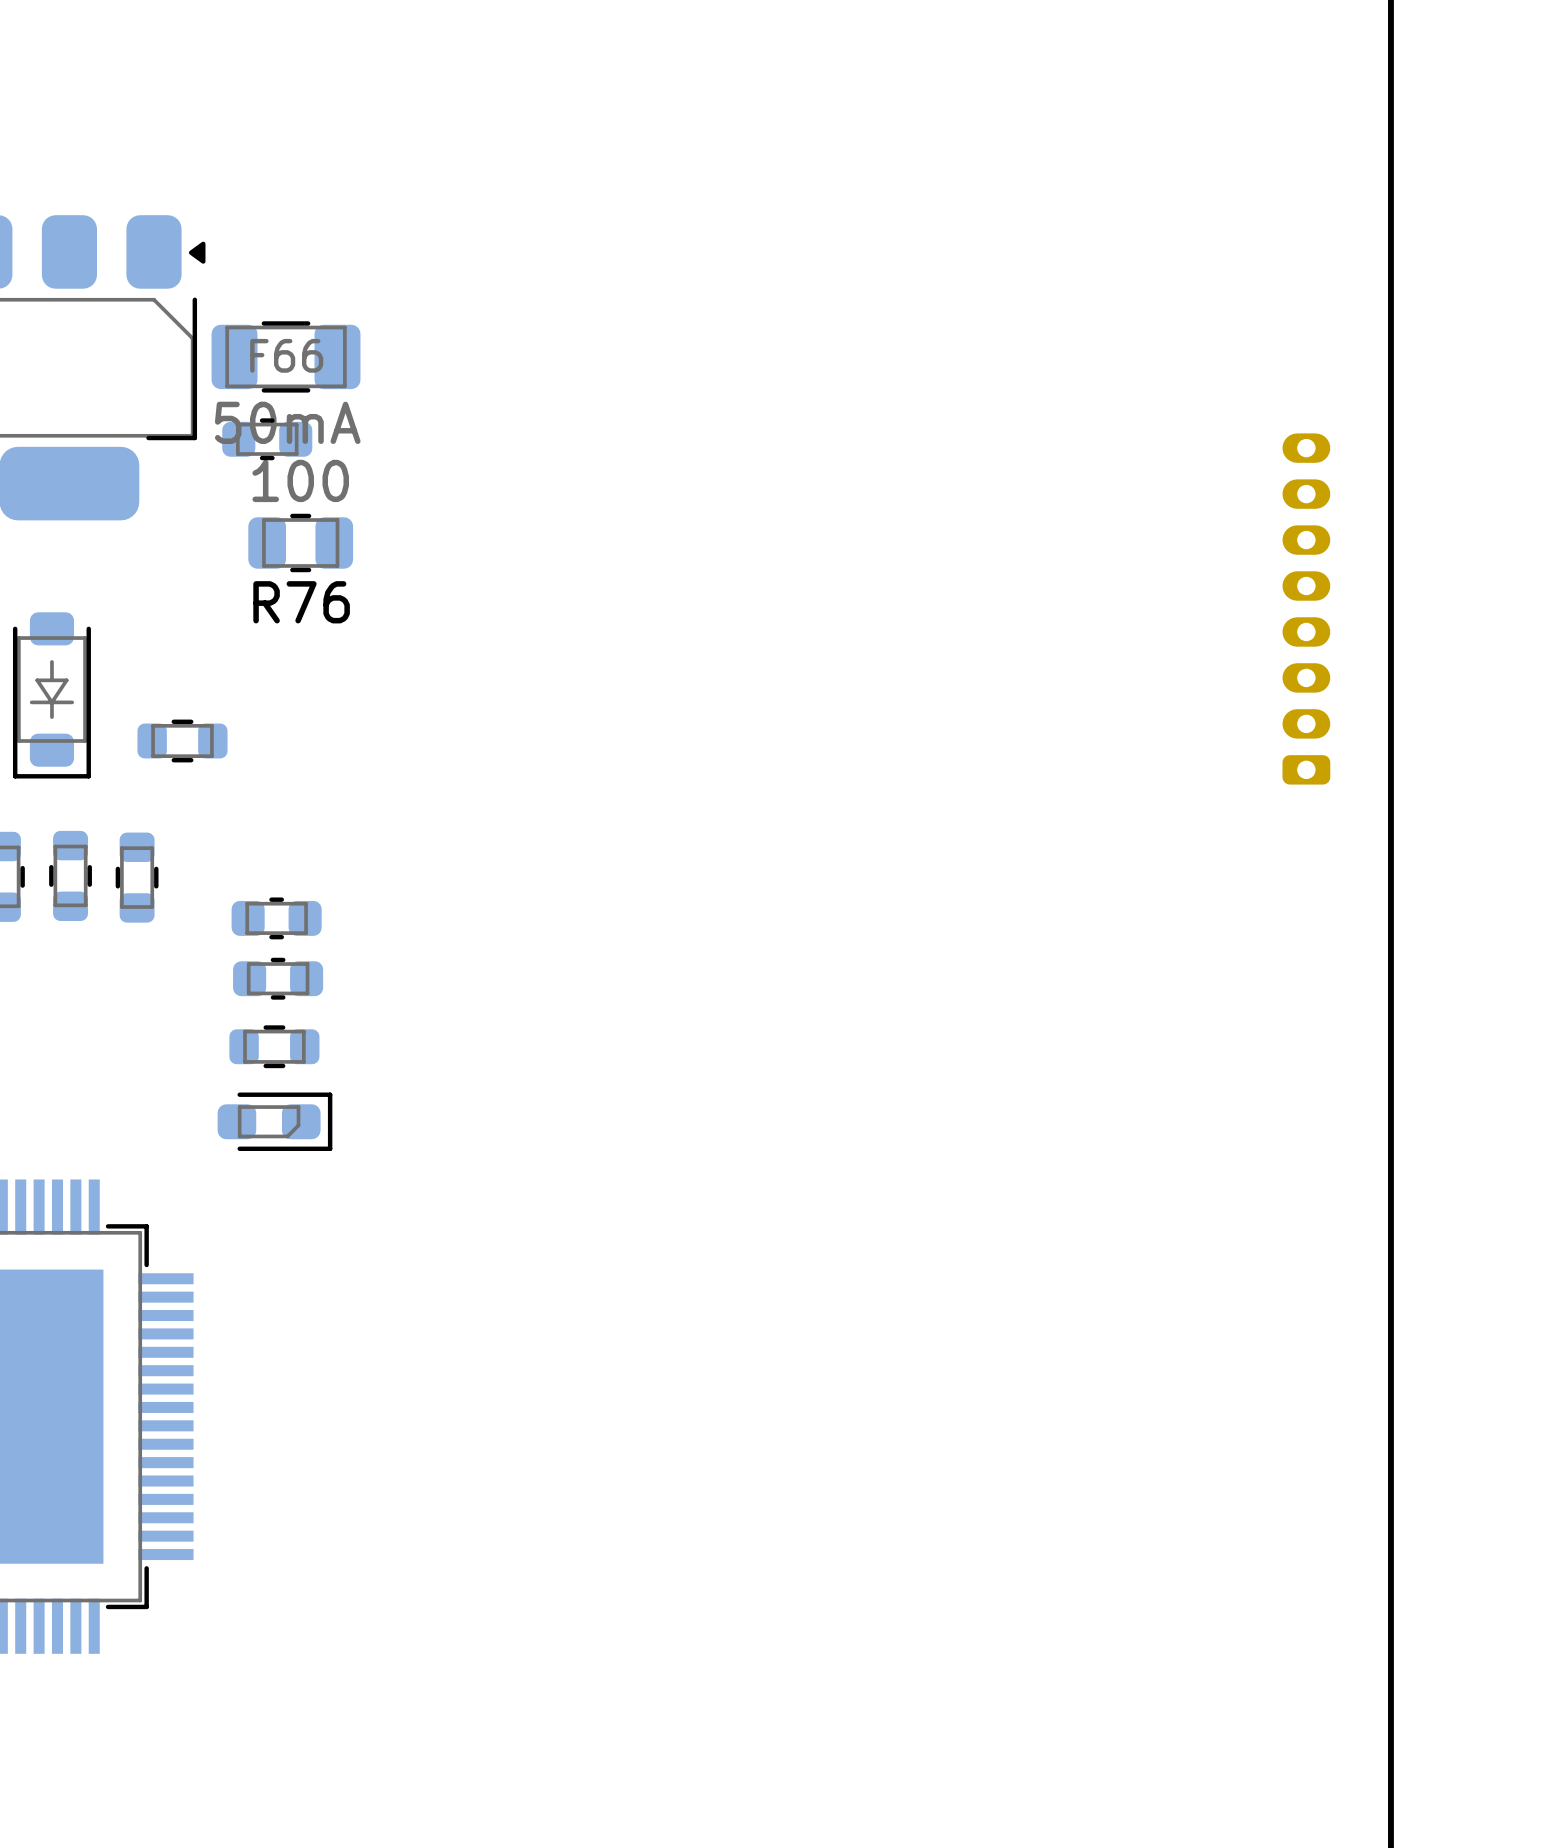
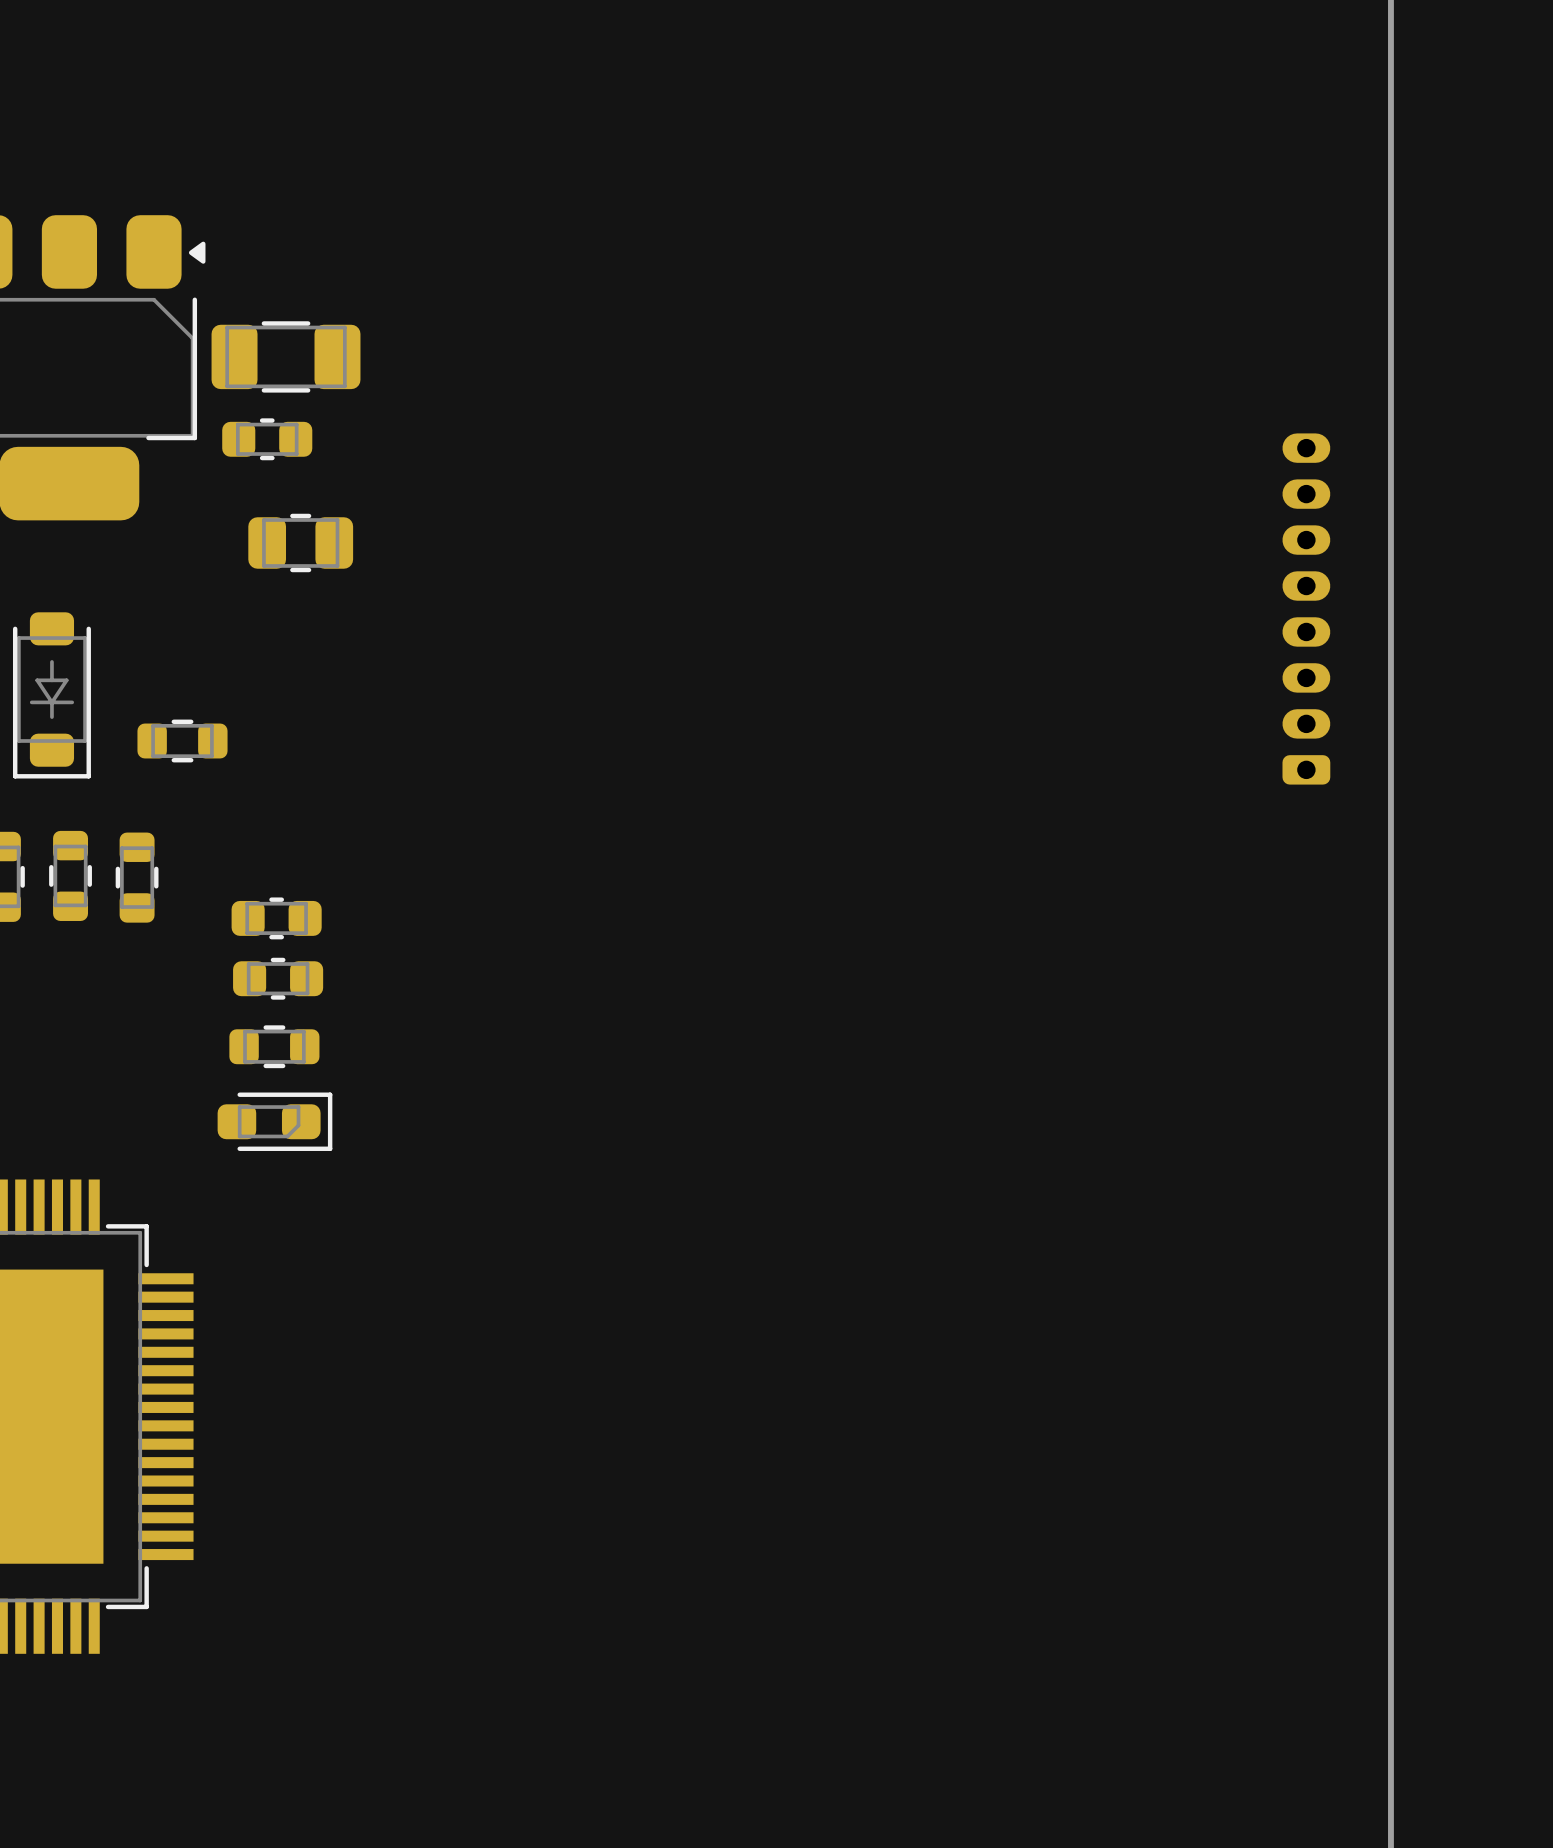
F66 name: F66 (286, 355) -> none
F66 value: 50mA (287, 422) -> none
R76 value: 100 (300, 480) -> none
R76 name: R76 (301, 602) -> none

